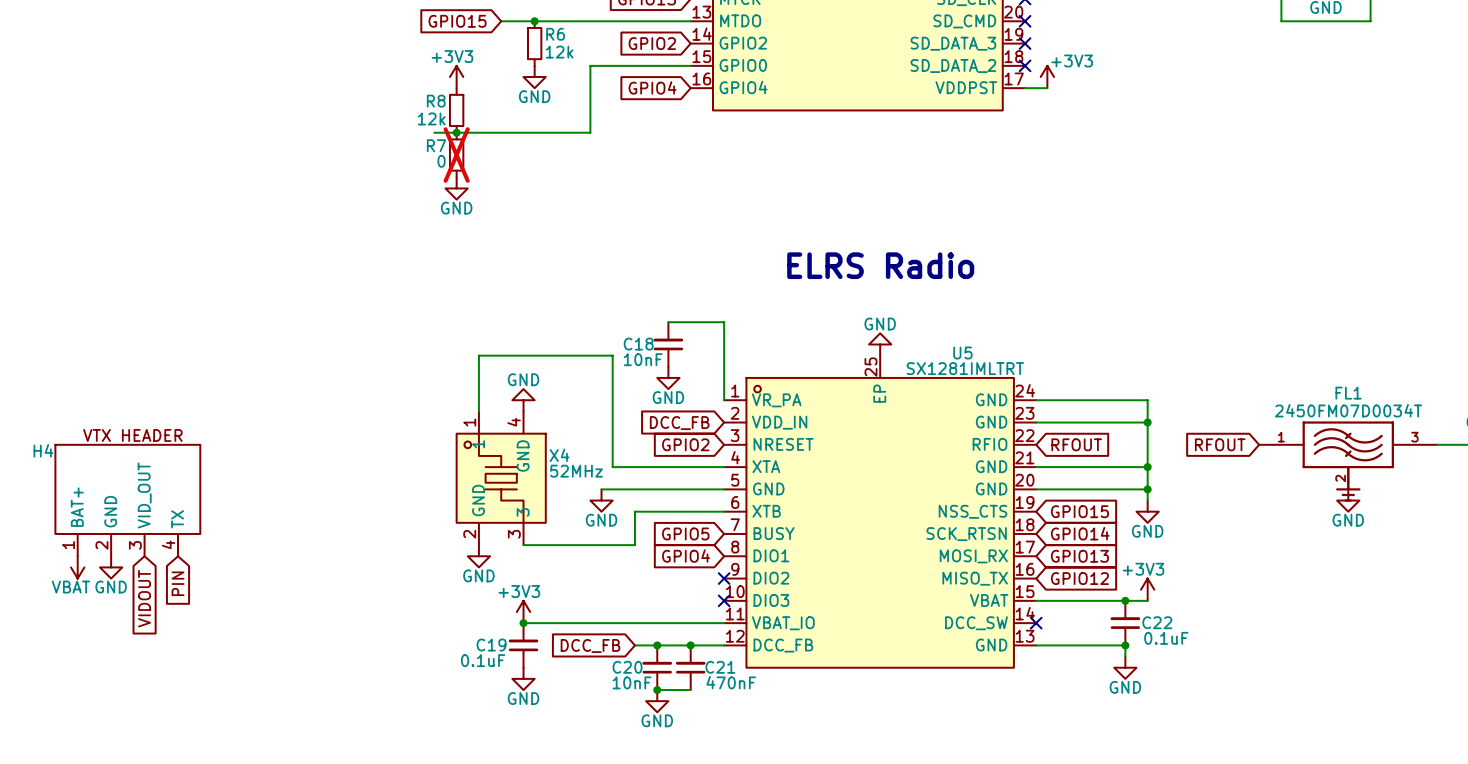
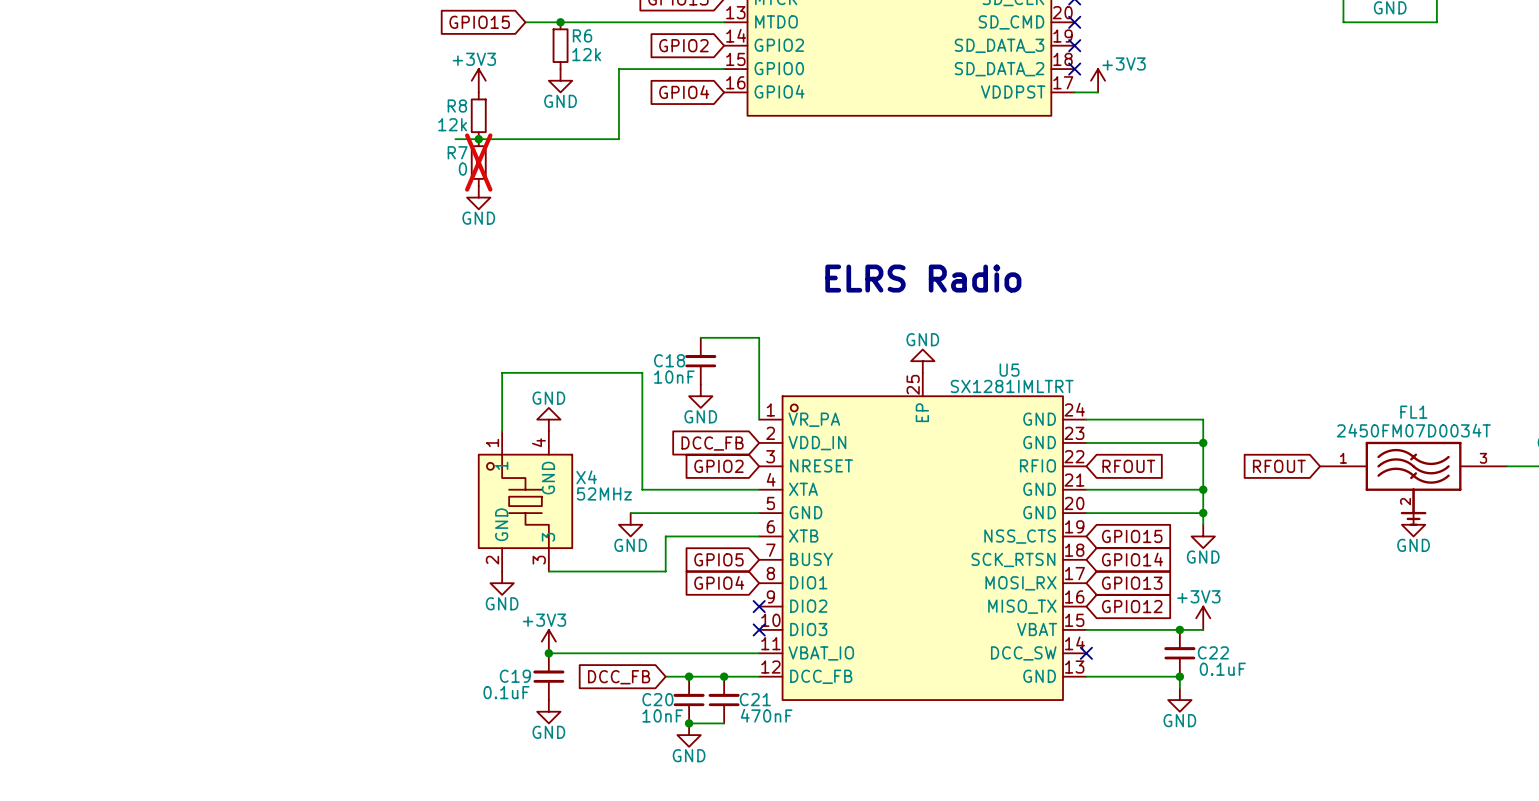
H4: (127, 500) -> none
power symbol: VBAT (77, 567) -> none
power symbol: GND (111, 567) -> none
global label: PIN (178, 583) -> none
global label: VIDOUT (144, 598) -> none

